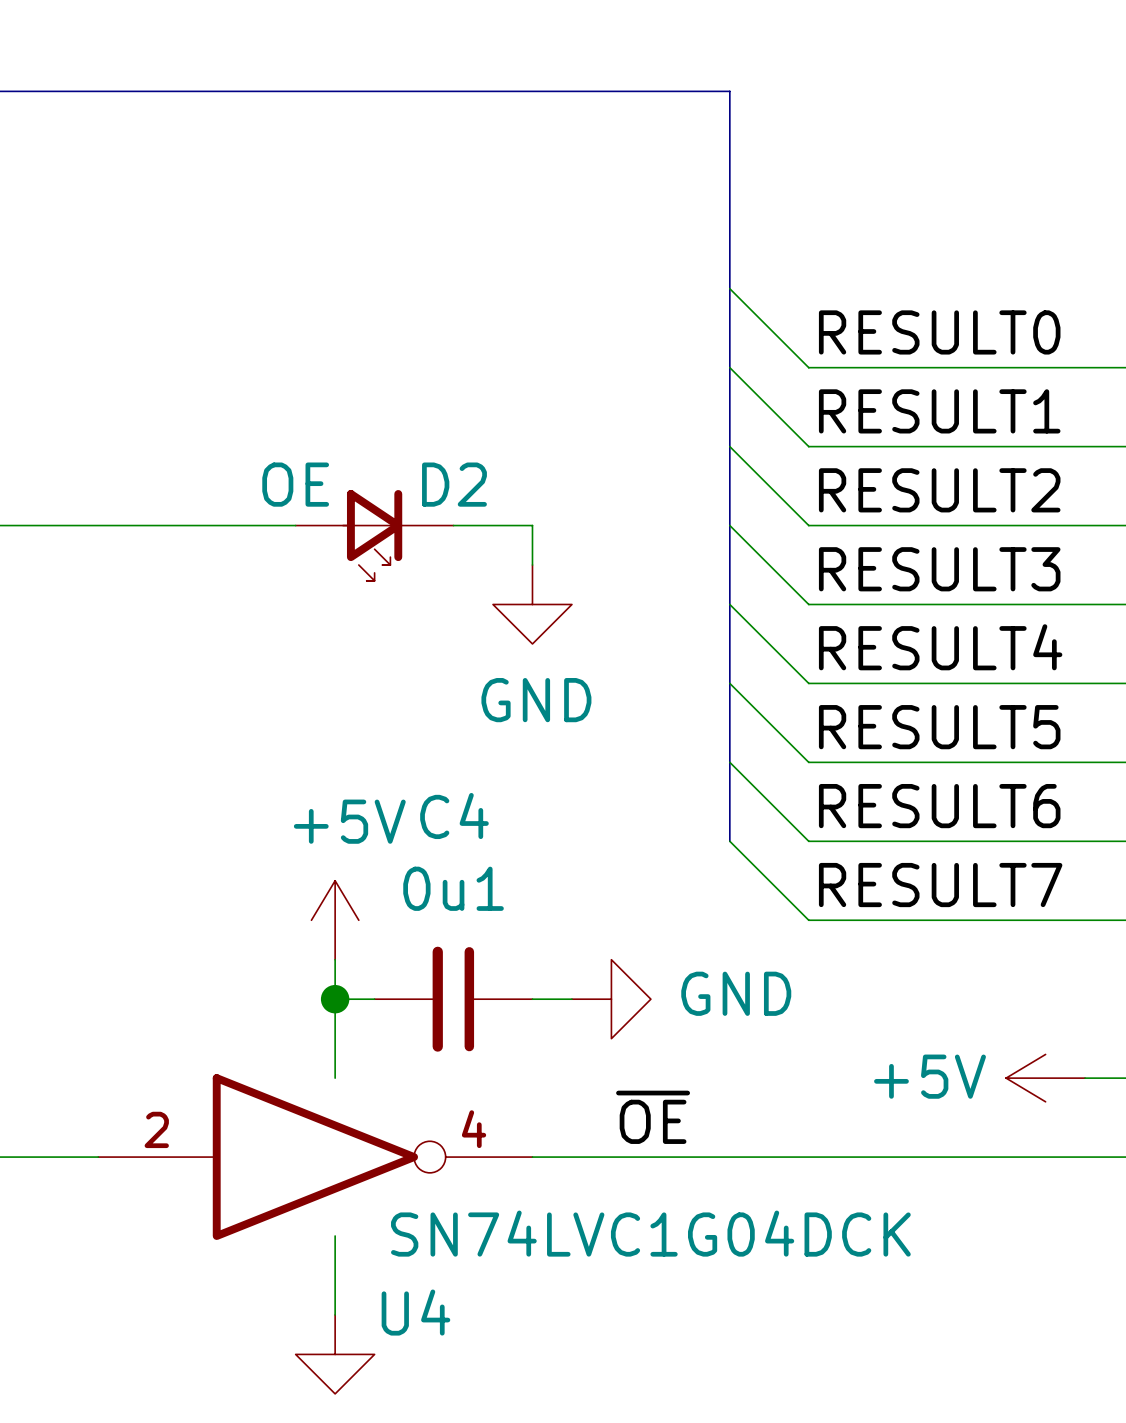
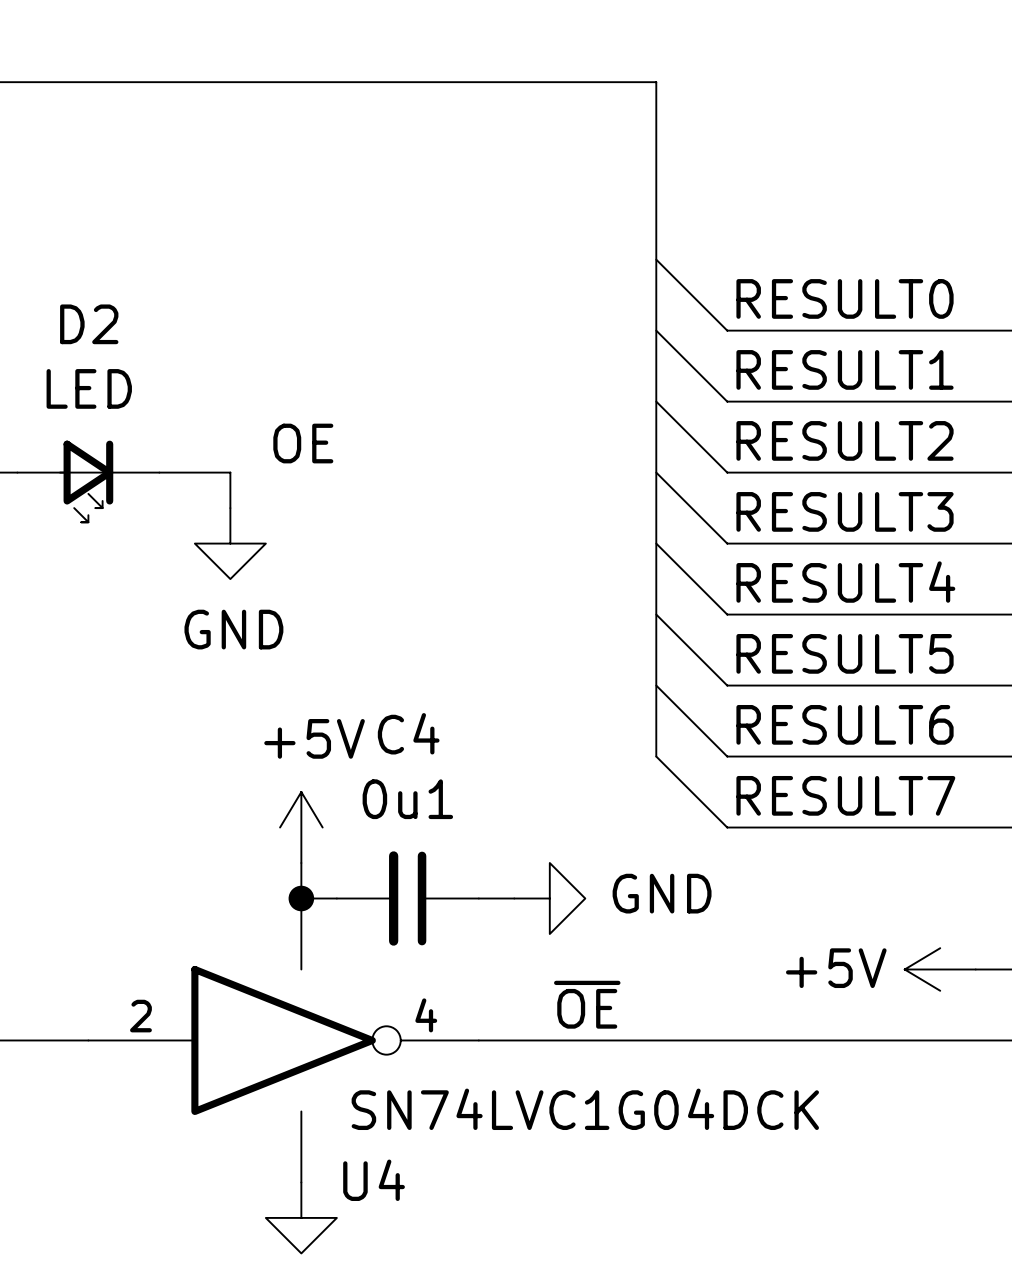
D2 value: OE (295, 484) -> LED (89, 388)
D2 name position: D2 (454, 484) -> D2 (89, 324)
text: none -> OE (303, 443)
wire: (256, 525) (295, 525) -> (230, 472) (230, 508)
wire: (453, 525) (532, 525) (532, 565) -> none
D2 position: (374, 535) -> (88, 481)
power symbol position: GND (532, 604) -> GND (230, 543)

